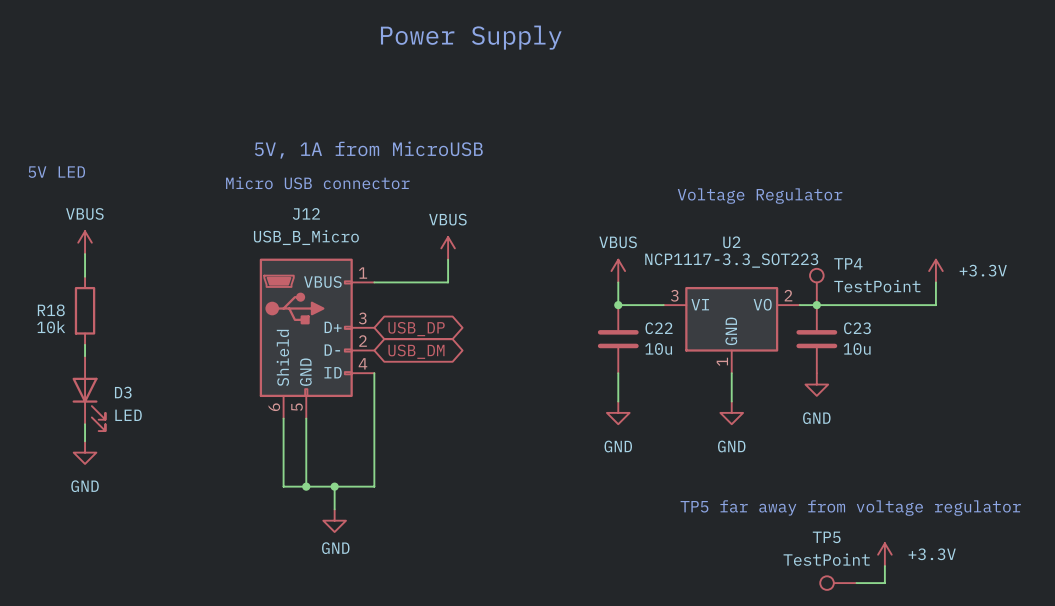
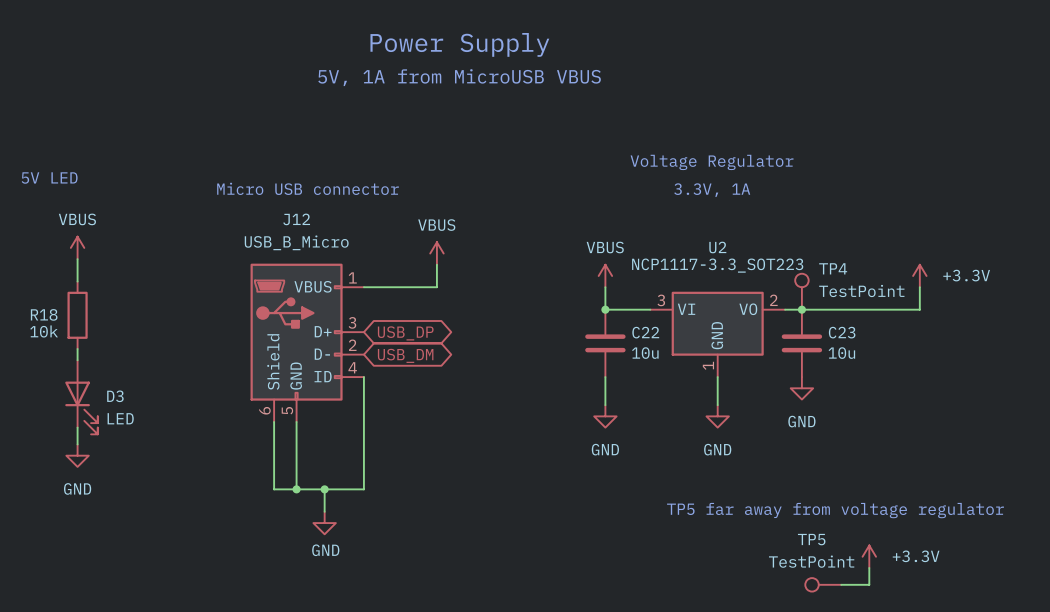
text: none -> 5V, 1A from MicroUSB VBUS (459, 77)
text: 5V, 1A from MicroUSB (368, 150) -> none
text: none -> 3.3V, 1A (712, 190)
text position: Voltage Regulator (760, 196) -> Voltage Regulator (712, 162)

